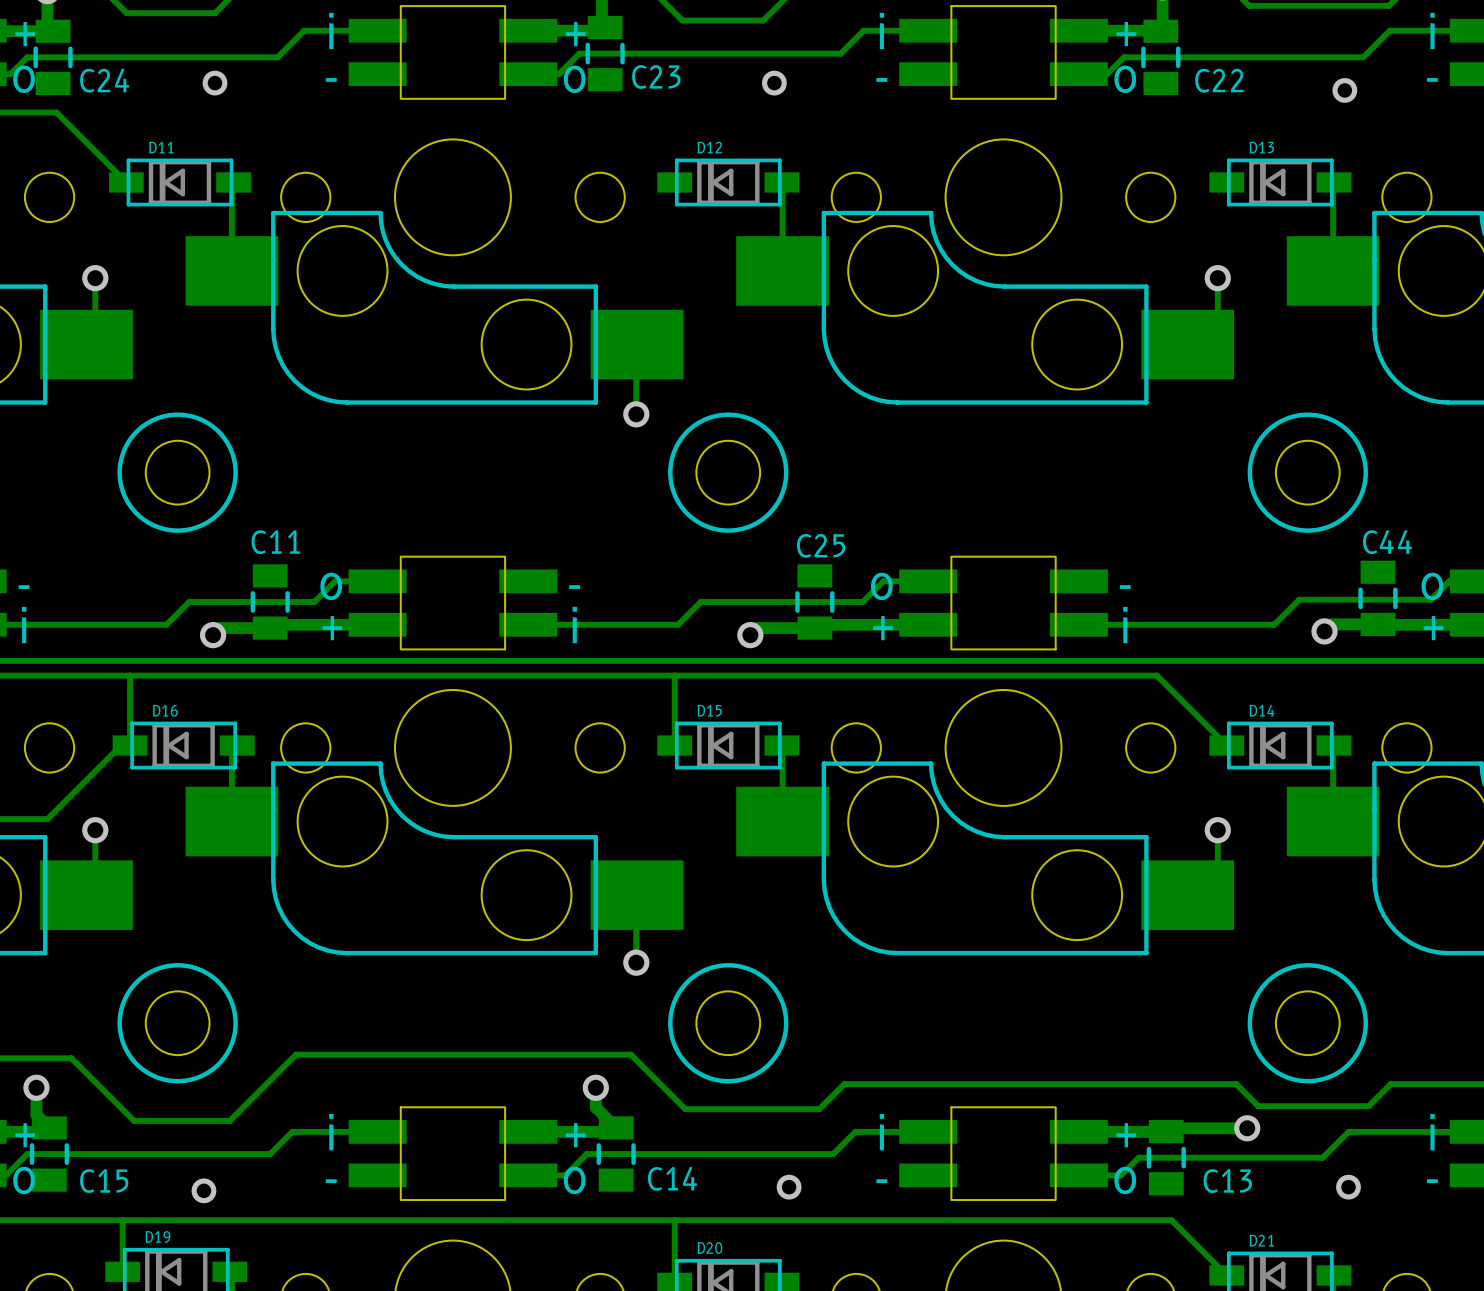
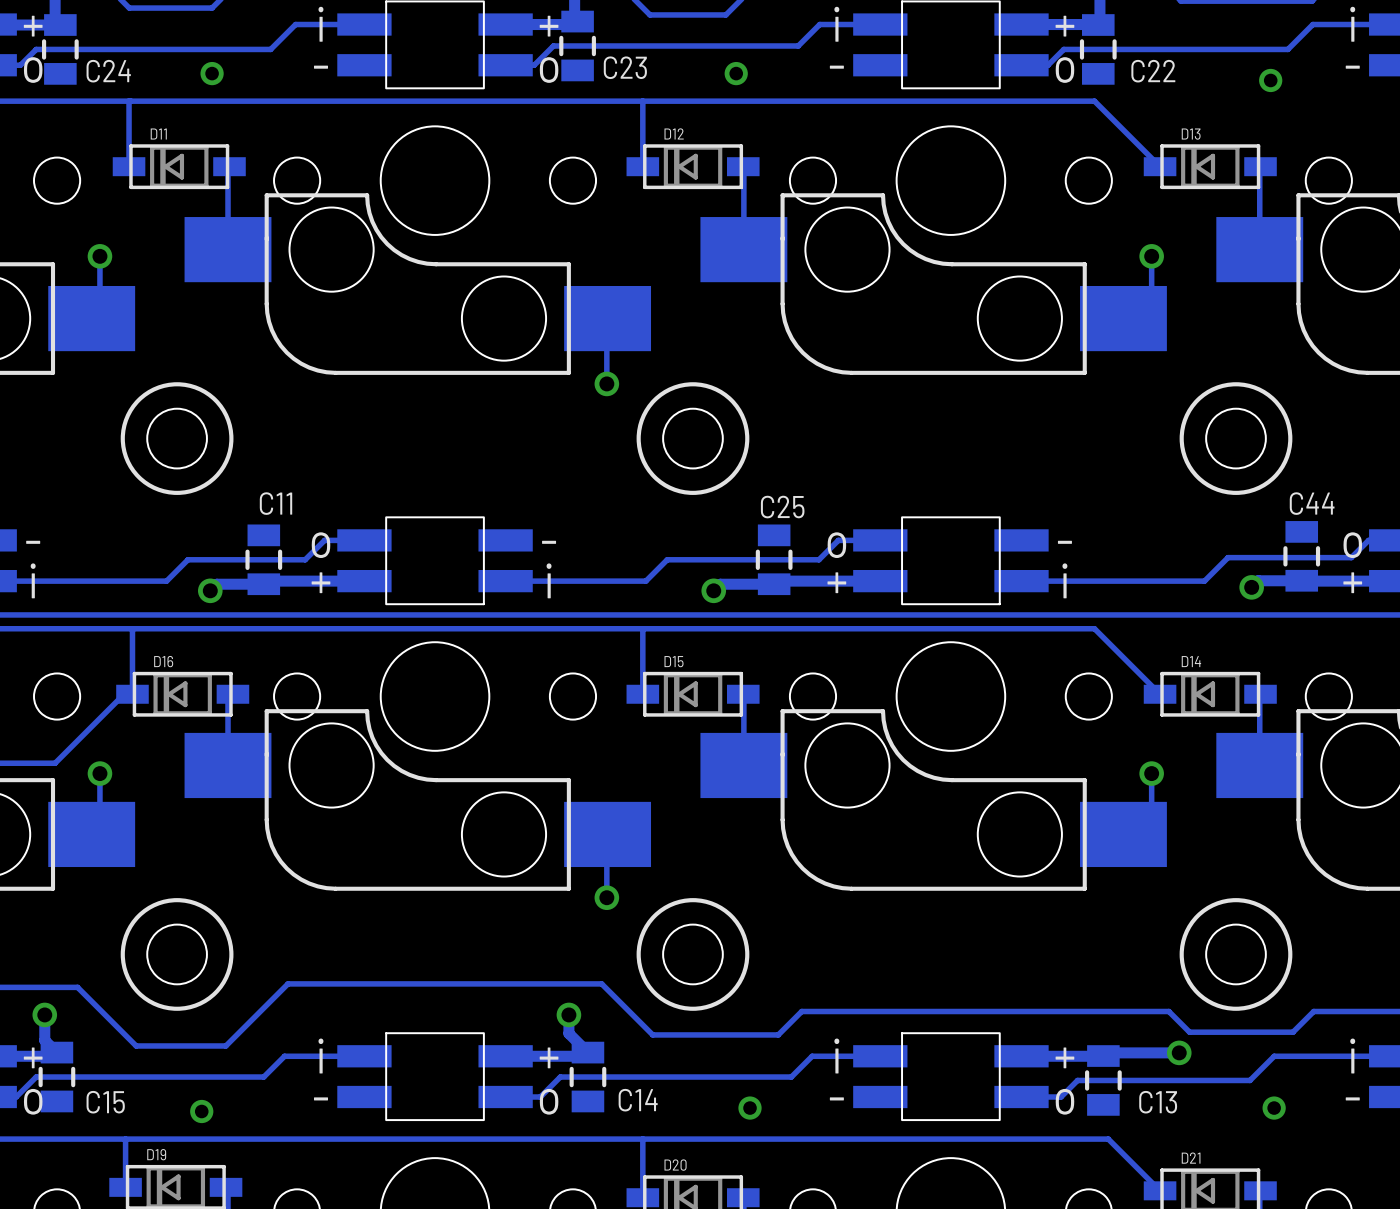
track: (56, 112) (126, 182) -> (129, 101) (129, 166)
track: none -> (63, 101) (1094, 101) (1160, 166)
track: none -> (642, 101) (642, 166)

